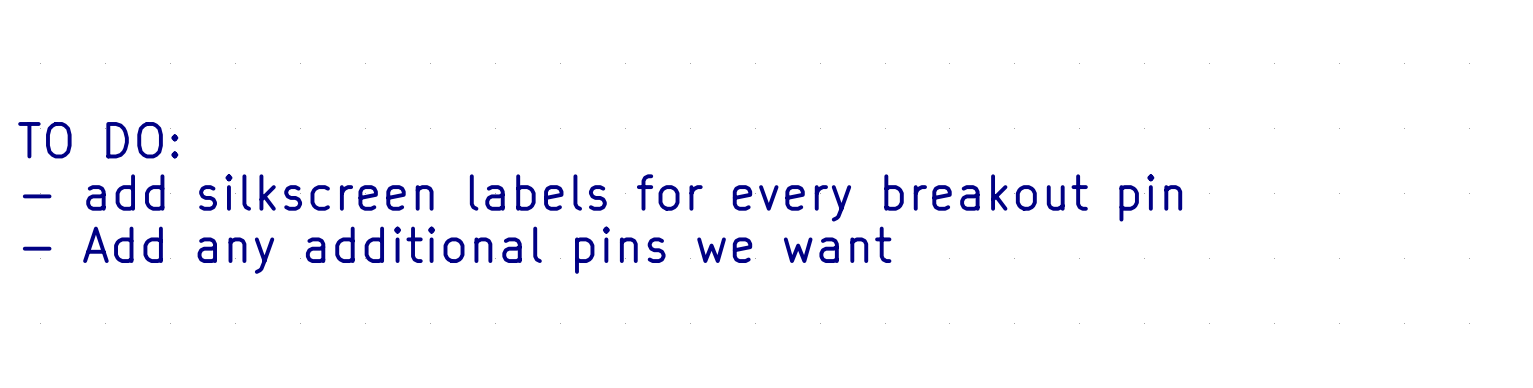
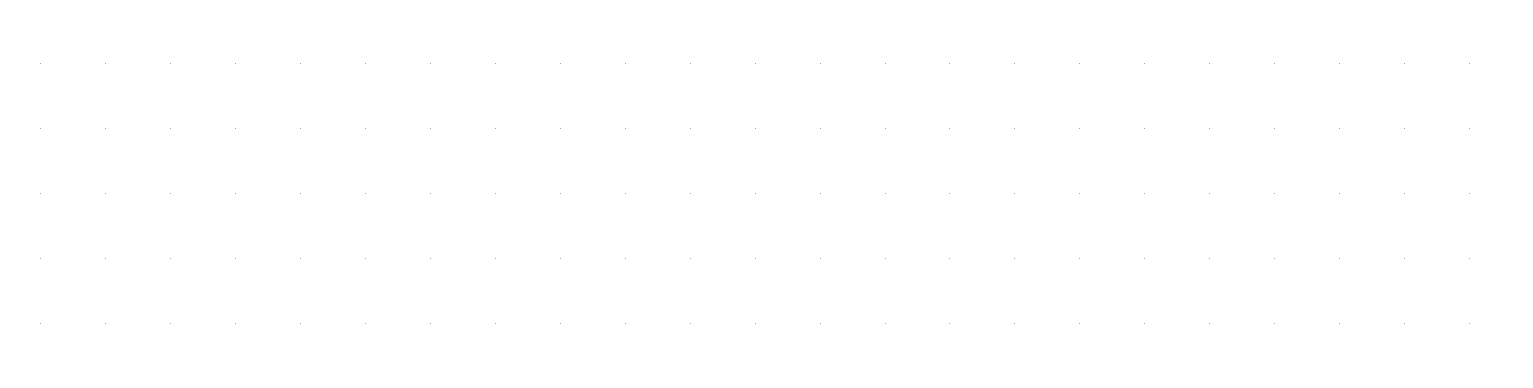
text: TO DO: (98, 140) -> none
text: - add silkscreen labels for every breakout pin (602, 197) -> none
text: - Add any additional pins we want (457, 250) -> none

